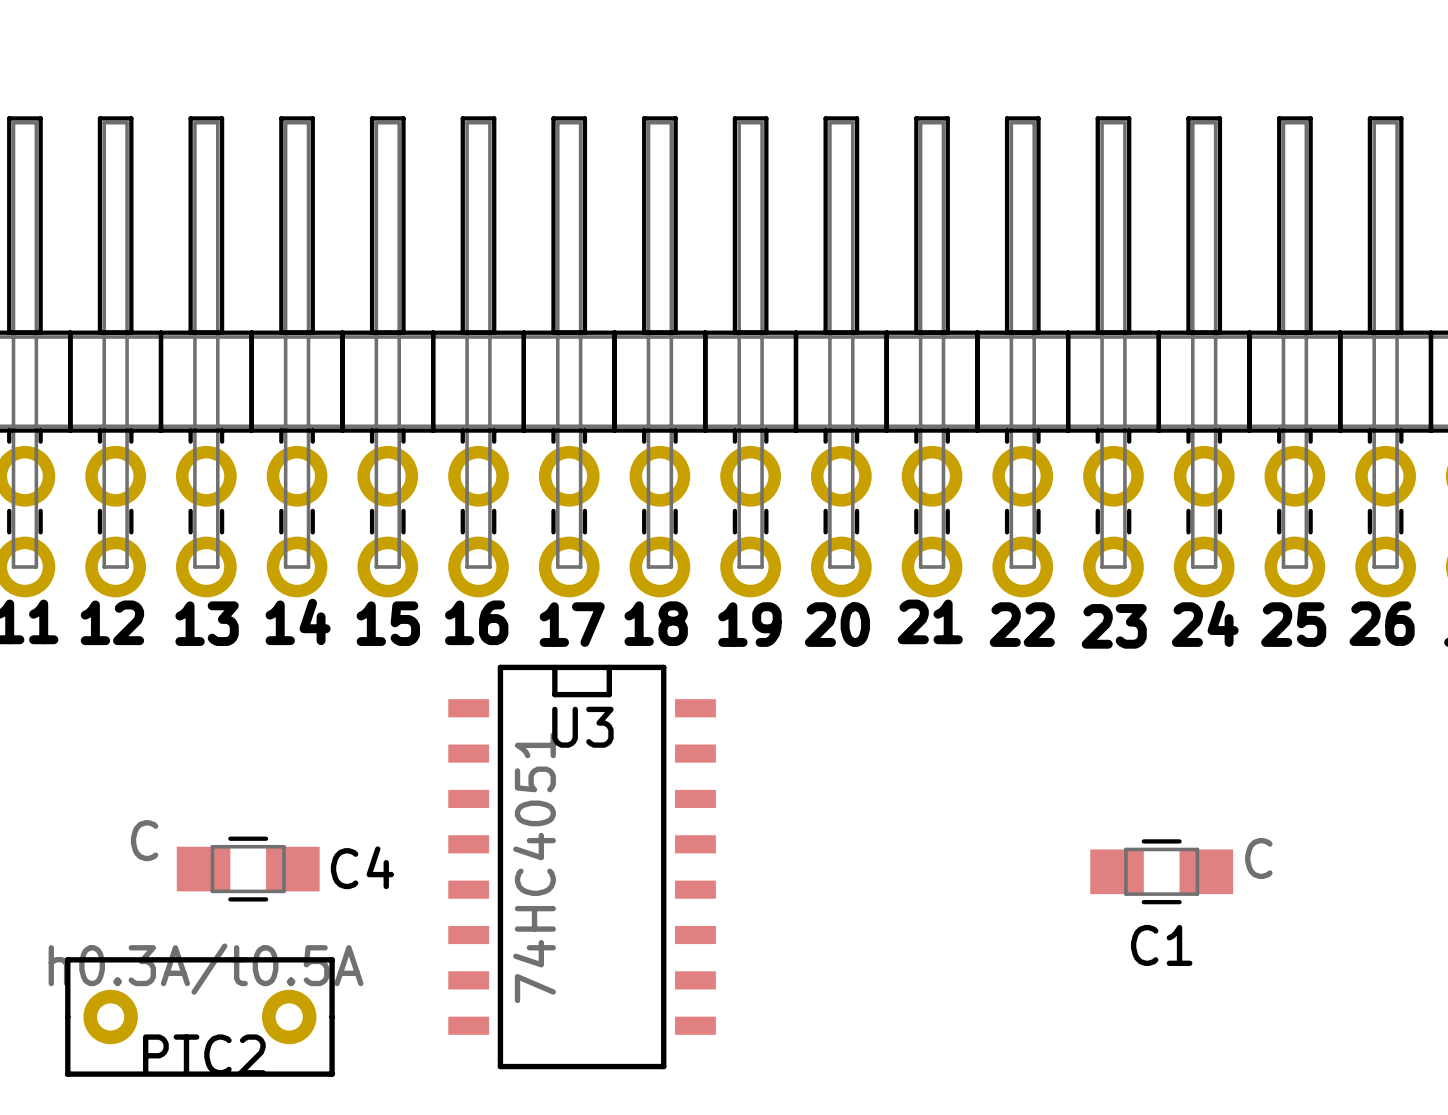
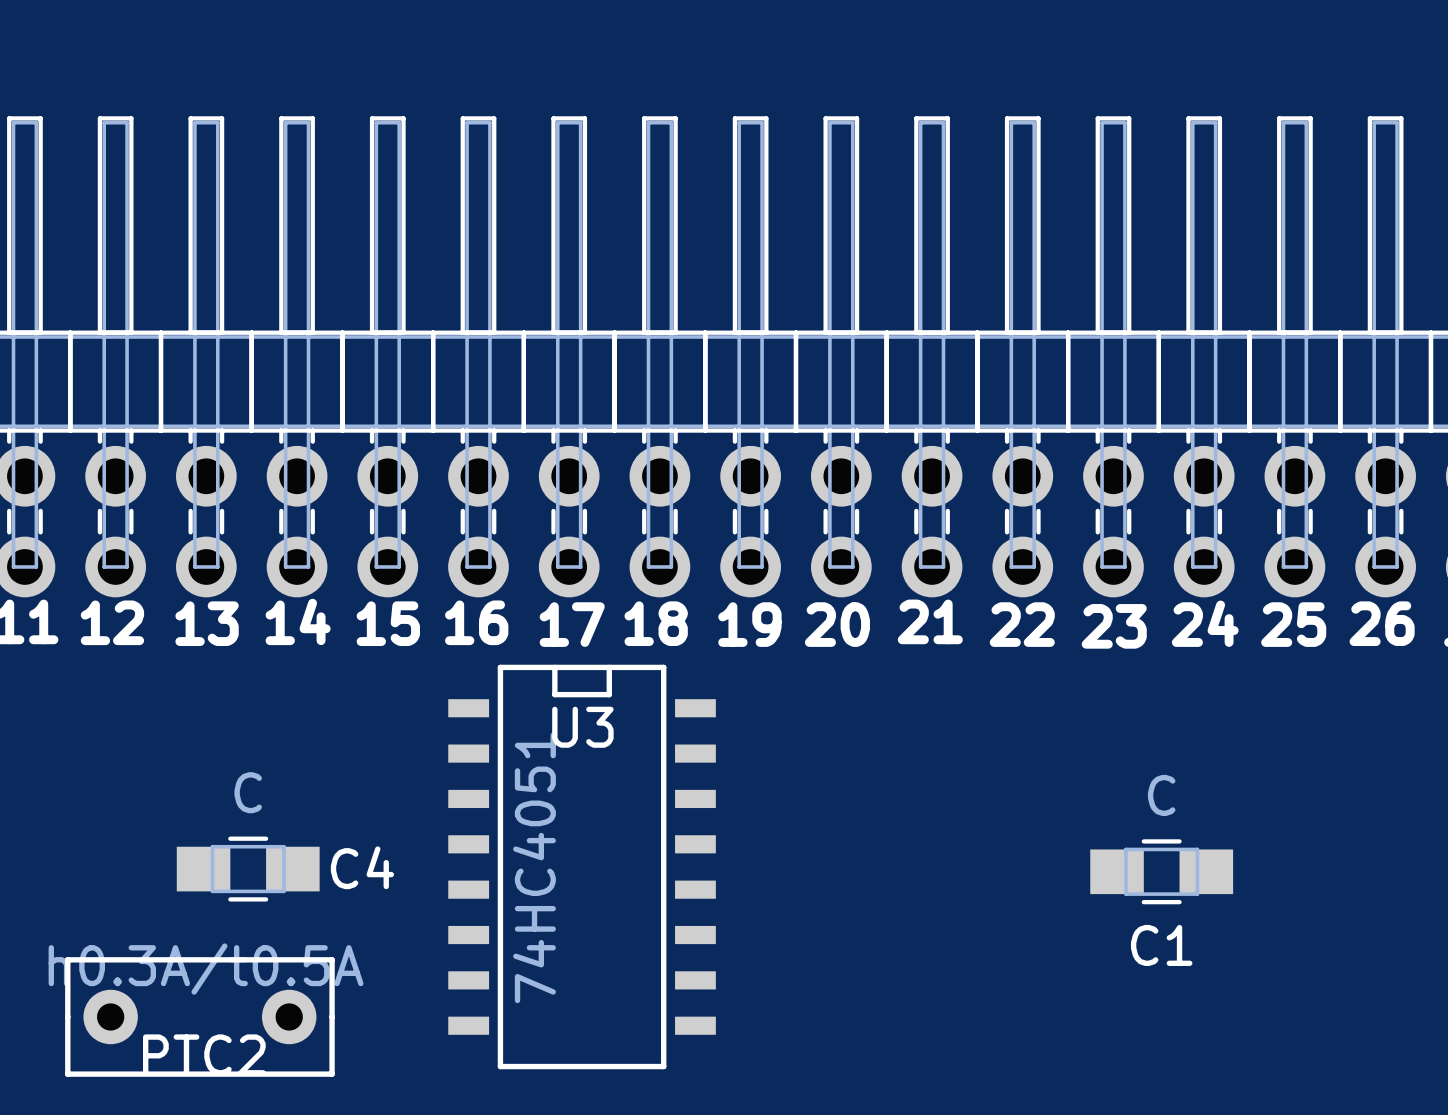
C4 value position: C (144, 840) -> C (248, 792)
C1 value position: C (1258, 858) -> C (1161, 795)

